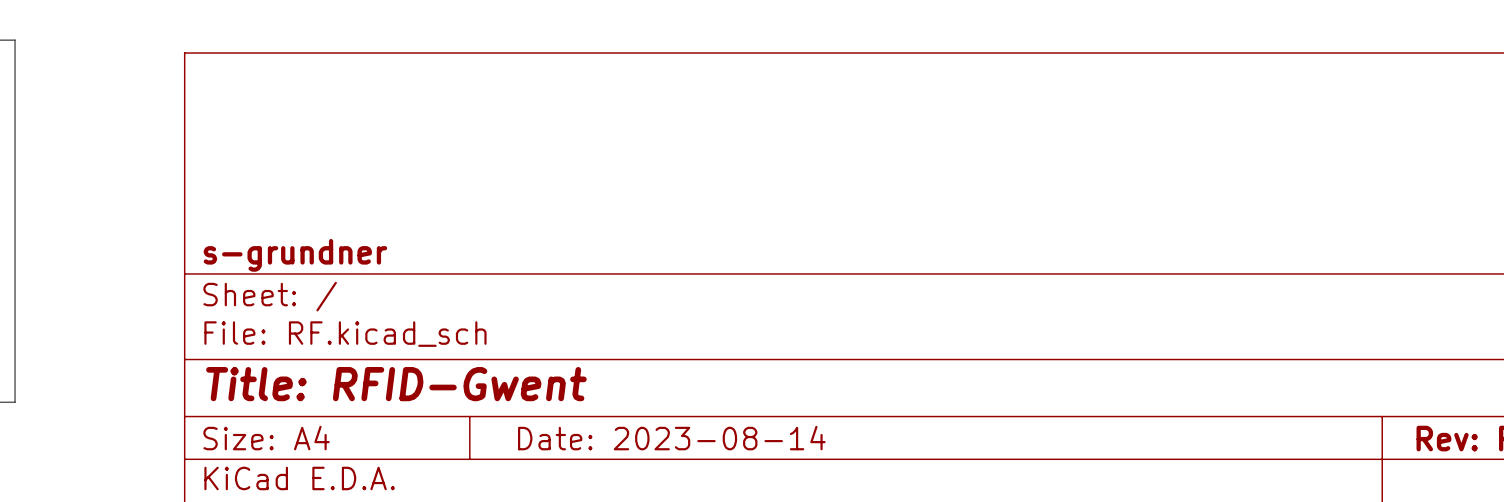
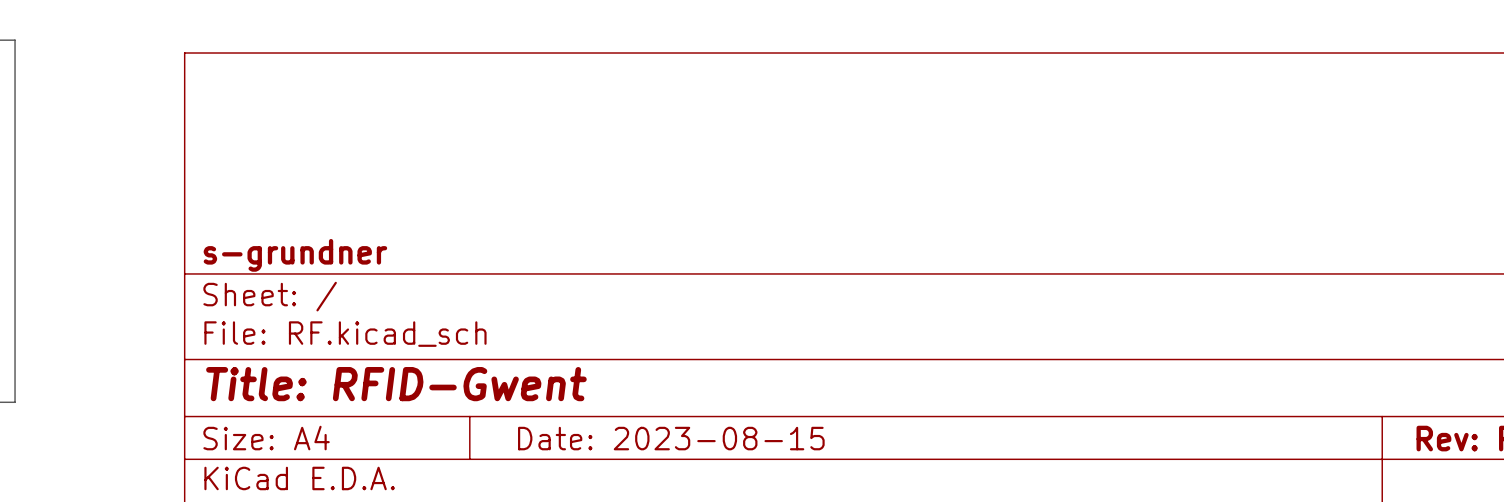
title block: Date: 2023-08-14 (671, 438) -> Date: 2023-08-15 (671, 438)

